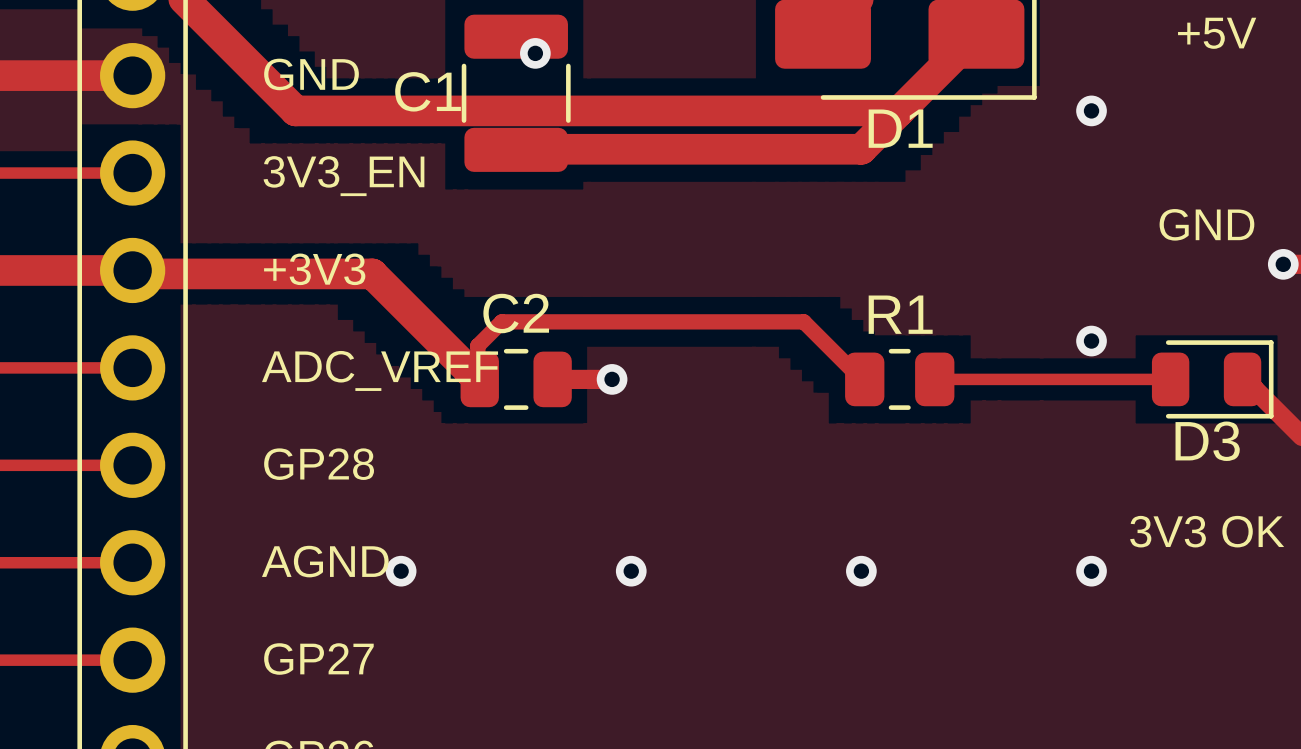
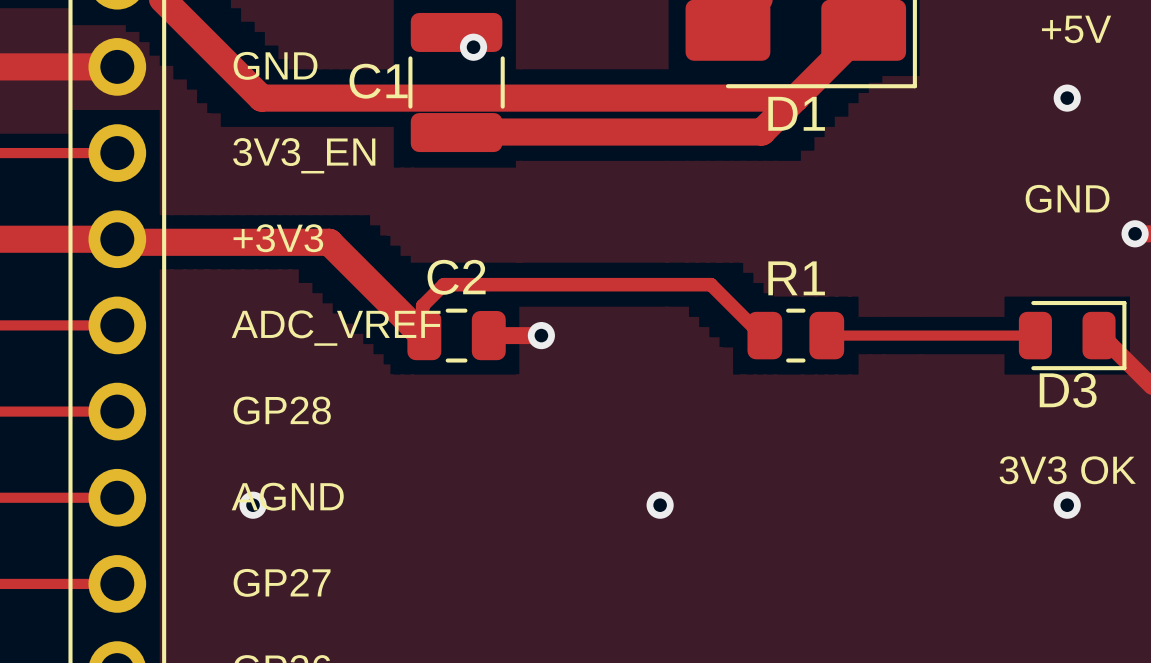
via: (1091, 110) -> none
via: none -> (1067, 98)
via: (1091, 341) -> none
via position: (401, 571) -> (253, 505)
via: (631, 571) -> none
via: none -> (660, 505)
via: (861, 571) -> none
via: (1091, 571) -> none
via: none -> (1067, 505)

